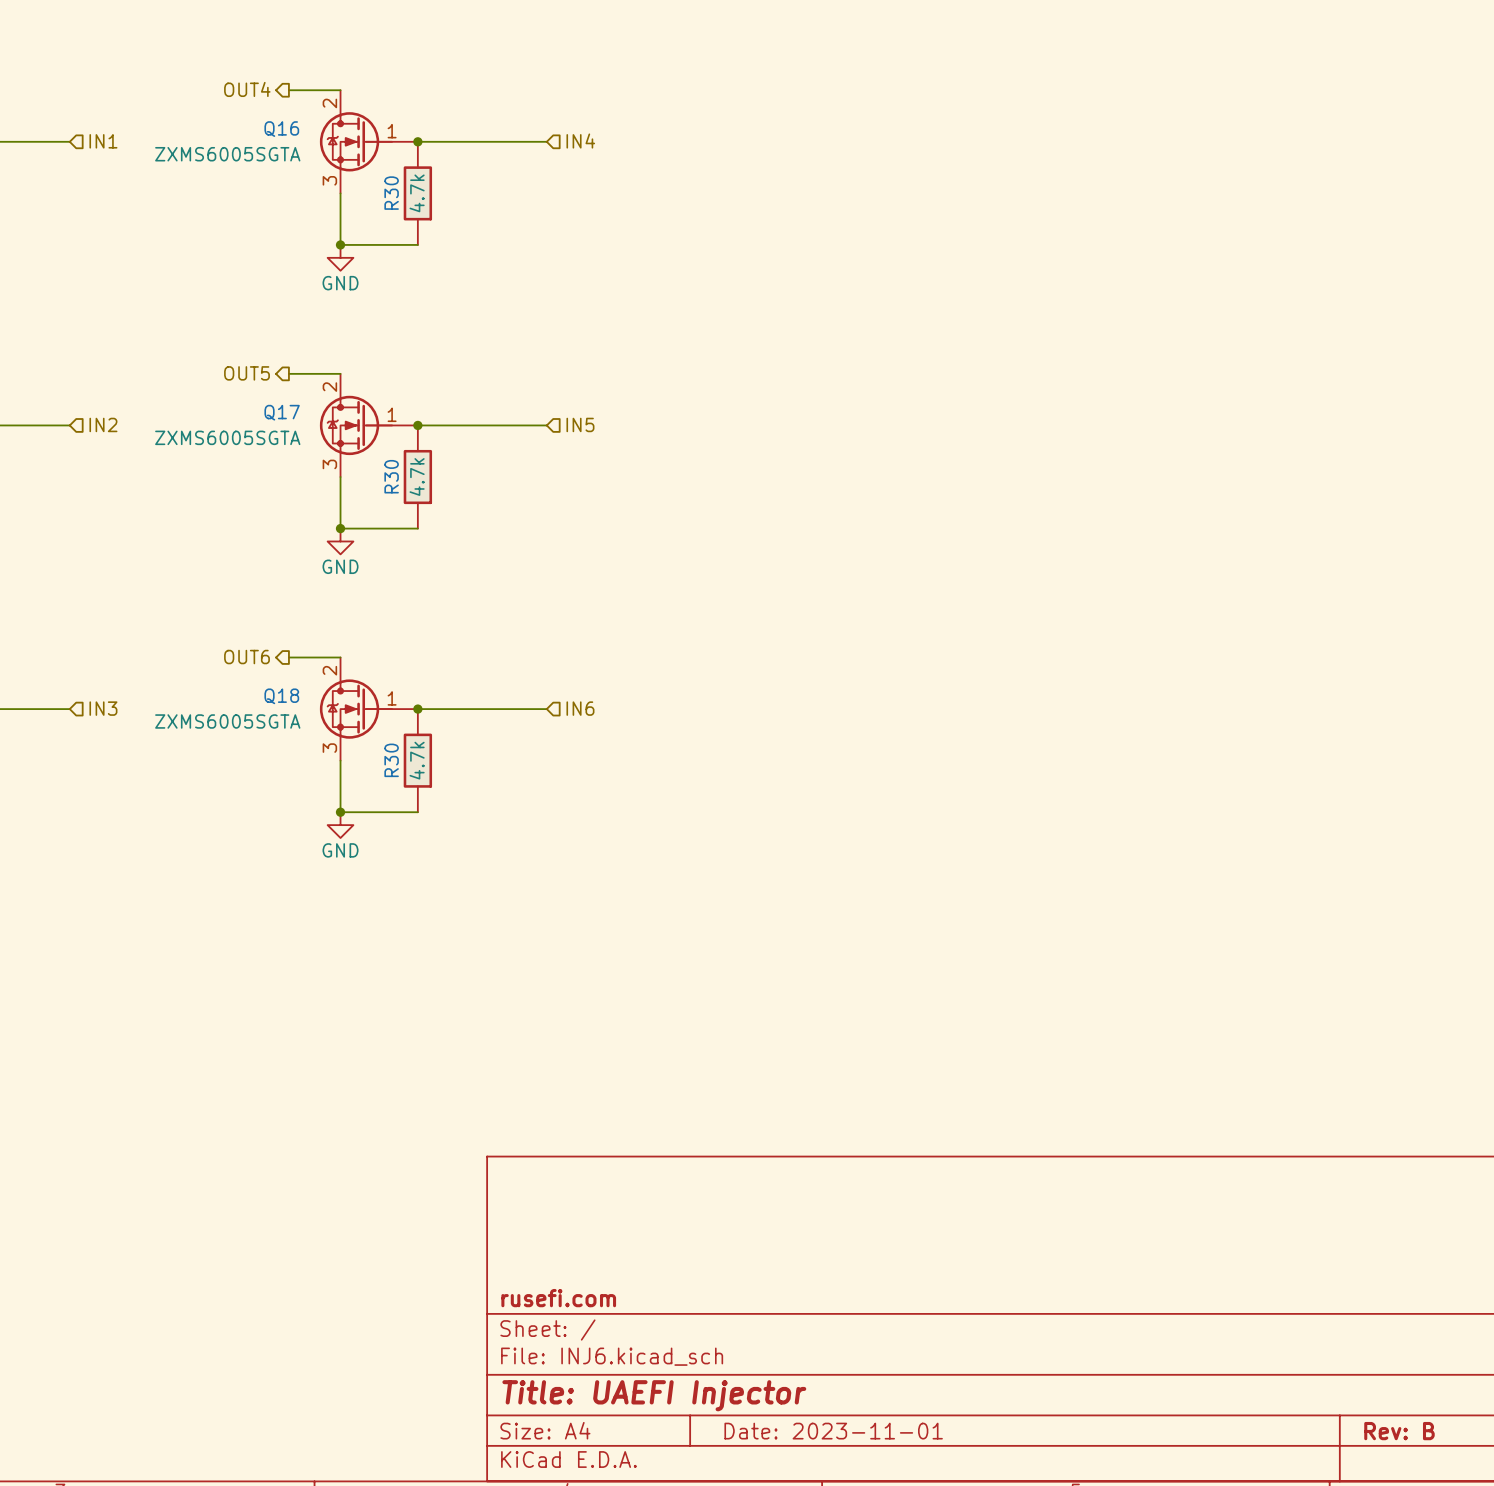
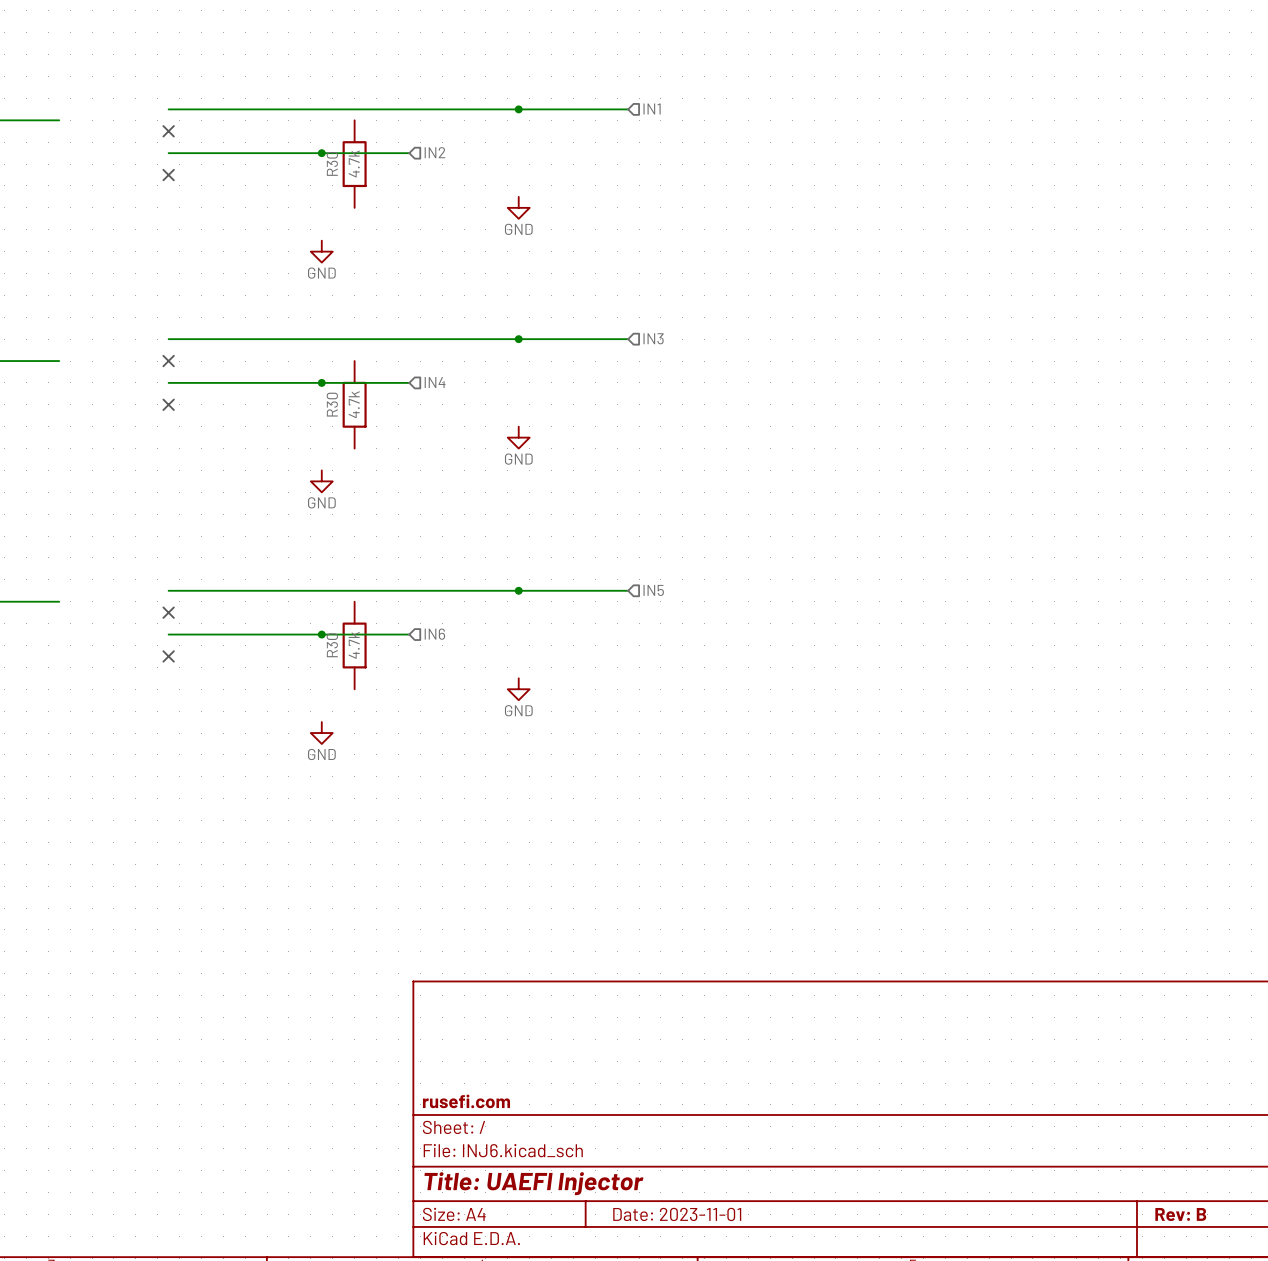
hierarchical label: OUT4 (247, 89) -> none
wire: (288, 90) (340, 90) -> none
wire: none -> (168, 109) (628, 109)
junction: none -> (518, 109)
hierarchical label: none -> IN1 (652, 108)
hierarchical label: IN1 (103, 141) -> none
Q16: ZXMS6005SGTA (368, 141) -> none
wire: (417, 141) (546, 141) -> none
junction: (417, 141) -> none
hierarchical label: IN4 (580, 141) -> none
no-connect mark: none -> (168, 131)
wire: none -> (168, 153) (409, 153)
junction: none -> (321, 153)
hierarchical label: none -> IN2 (434, 152)
wire: (340, 193) (340, 244) (417, 244) -> none
no-connect mark: none -> (168, 175)
junction: (340, 244) -> none
power symbol: none -> GND (518, 207)
power symbol position: GND (340, 257) -> GND (321, 251)
hierarchical label: OUT5 (247, 373) -> none
wire: (288, 373) (340, 373) -> none
wire: none -> (168, 339) (628, 339)
junction: none -> (518, 339)
hierarchical label: none -> IN3 (653, 338)
hierarchical label: IN2 (103, 424) -> none
hierarchical label: IN5 (580, 424) -> none
no-connect mark: none -> (168, 361)
Q17: ZXMS6005SGTA (368, 425) -> none
wire: (417, 425) (546, 425) -> none
junction: (417, 425) -> none
hierarchical label: none -> IN4 (435, 382)
wire: none -> (168, 382) (409, 382)
junction: none -> (321, 382)
no-connect mark: none -> (168, 404)
wire: (340, 477) (340, 528) (417, 528) -> none
power symbol: none -> GND (518, 437)
junction: (340, 528) -> none
power symbol position: GND (340, 541) -> GND (321, 481)
hierarchical label: OUT6 (247, 657) -> none
wire: (288, 657) (340, 657) -> none
hierarchical label: none -> IN5 (653, 590)
wire: none -> (168, 590) (628, 590)
junction: none -> (518, 590)
hierarchical label: IN3 (103, 708) -> none
hierarchical label position: IN6 (580, 708) -> IN6 (434, 634)
Q18: ZXMS6005SGTA (368, 709) -> none
wire: (417, 709) (546, 709) -> none
junction: (417, 709) -> none
no-connect mark: none -> (168, 612)
wire: none -> (168, 634) (409, 634)
junction: none -> (321, 634)
wire: (340, 760) (340, 812) (417, 812) -> none
no-connect mark: none -> (168, 656)
junction: (340, 812) -> none
power symbol: none -> GND (518, 689)
power symbol position: GND (340, 825) -> GND (321, 733)

